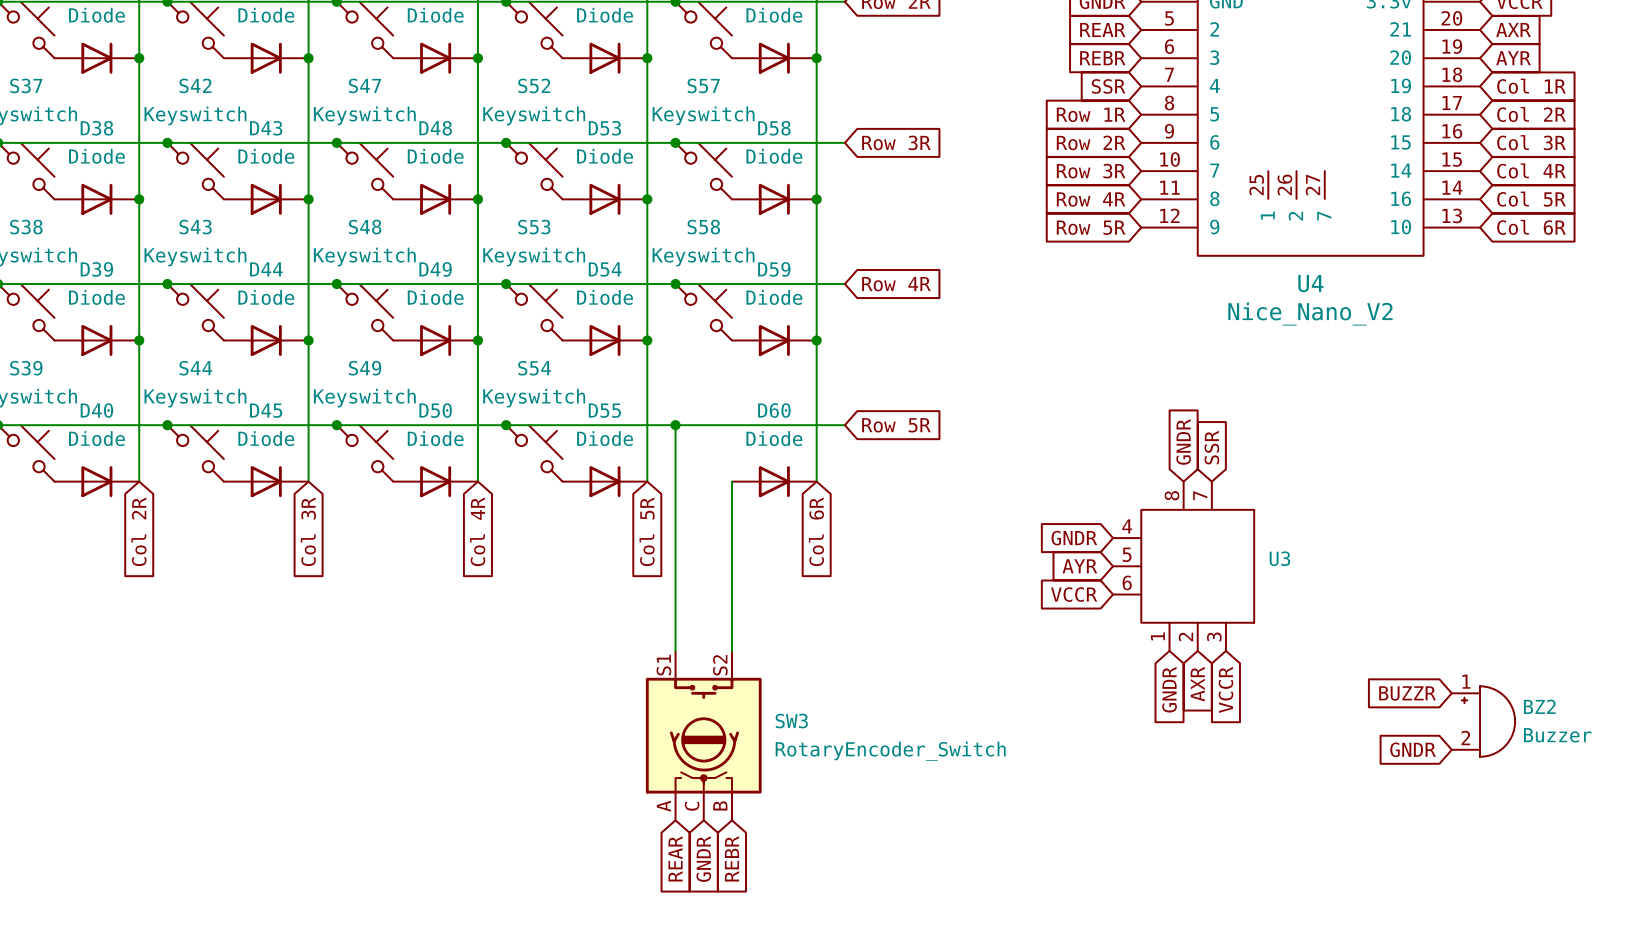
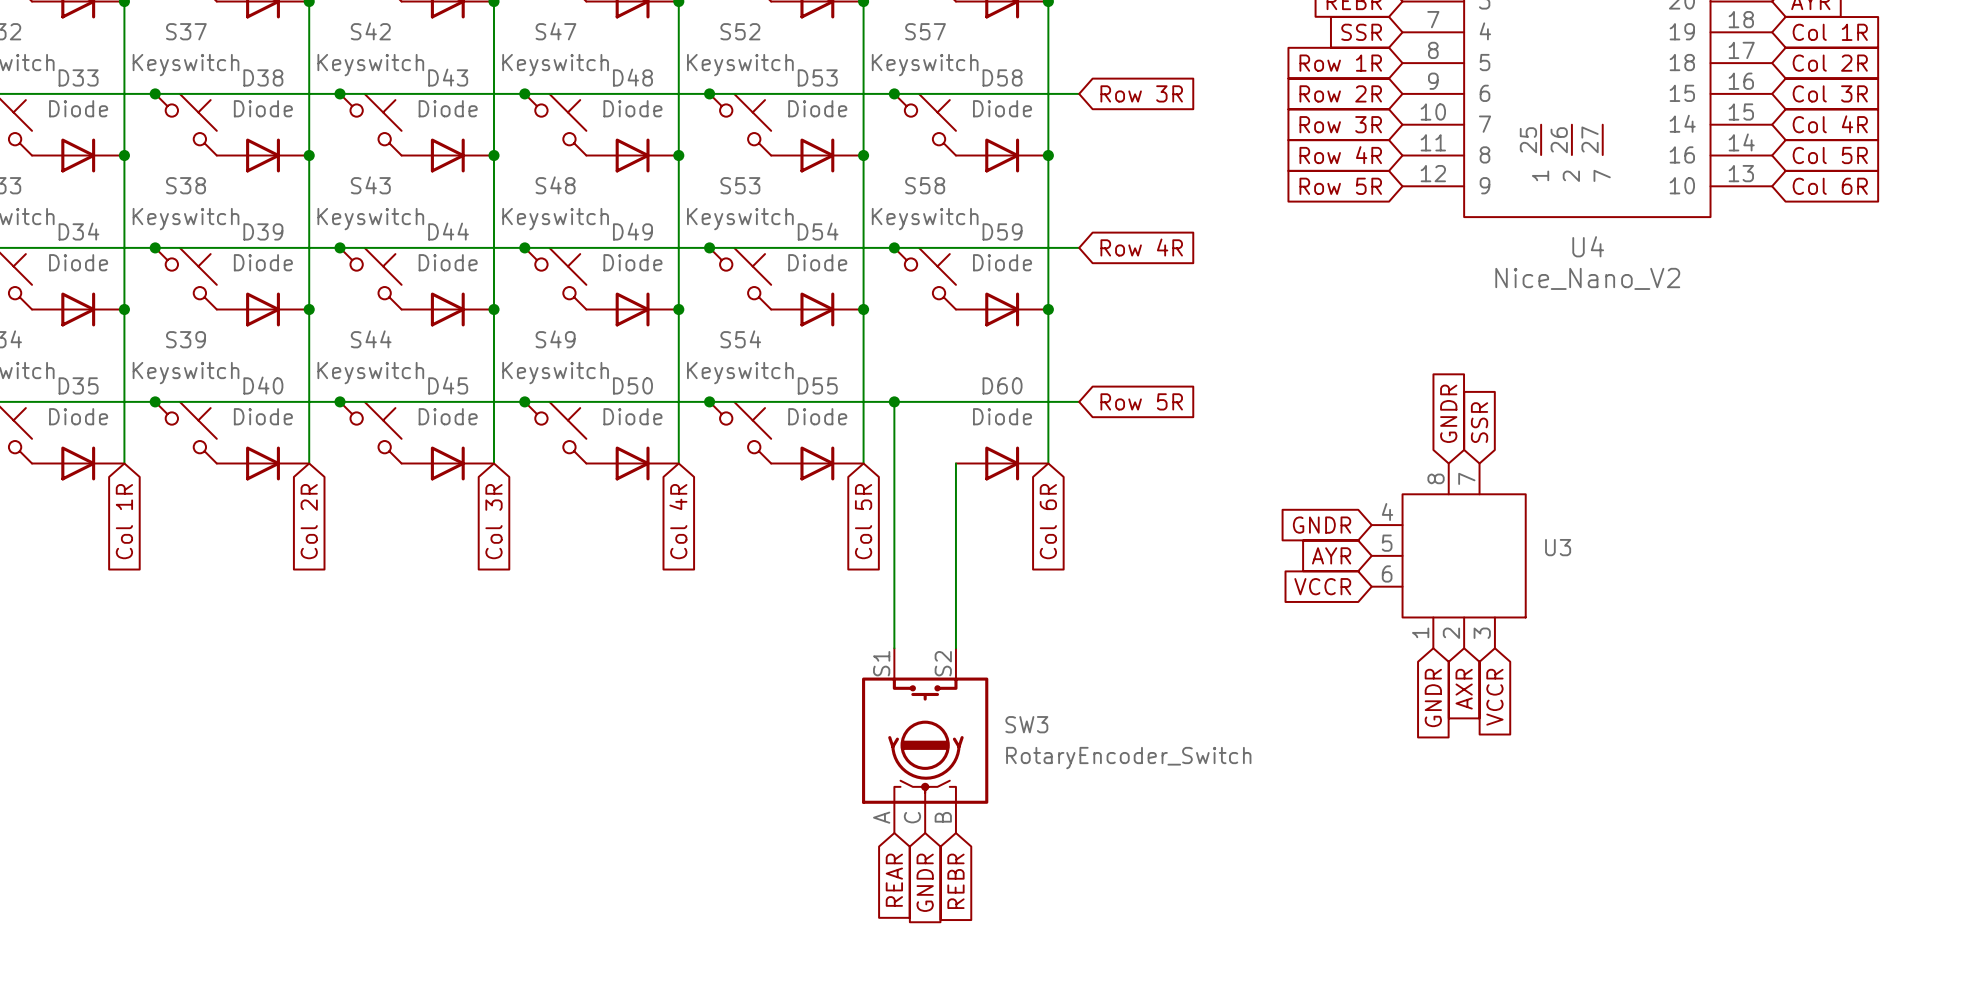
global label: BUZZR (1407, 693) -> none
BZ2: Buzzer (1483, 721) -> none
global label: GNDR (1413, 749) -> none

